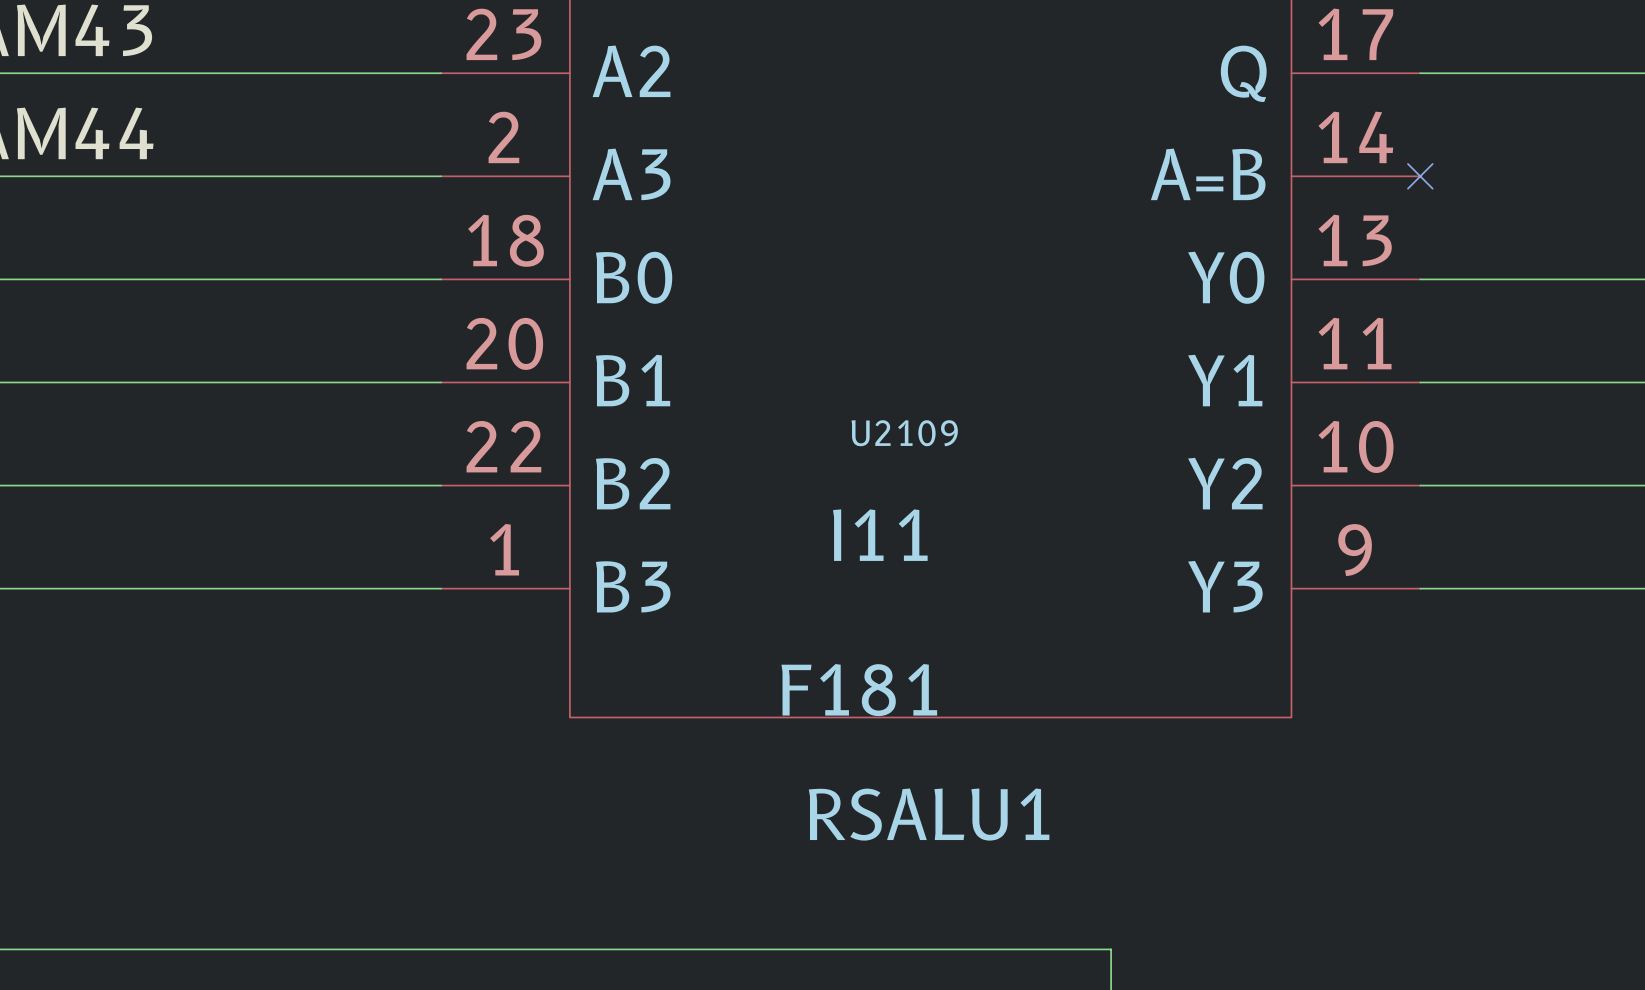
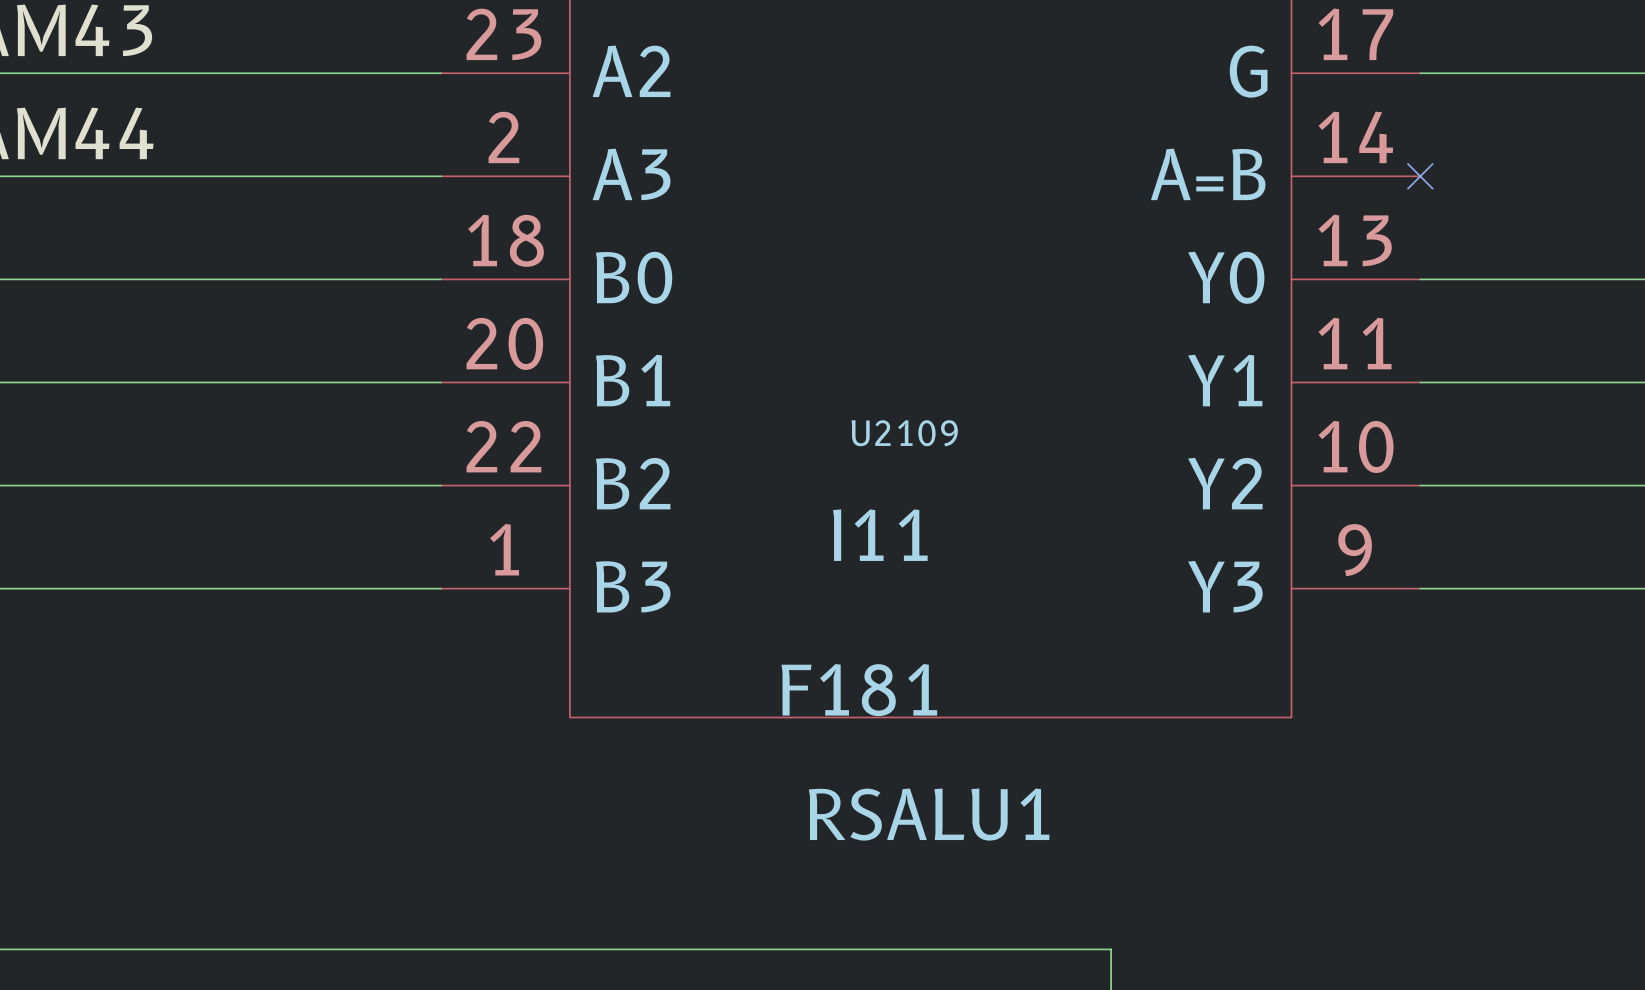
U2109 pin name: Q (1243, 73) -> G (1248, 71)

